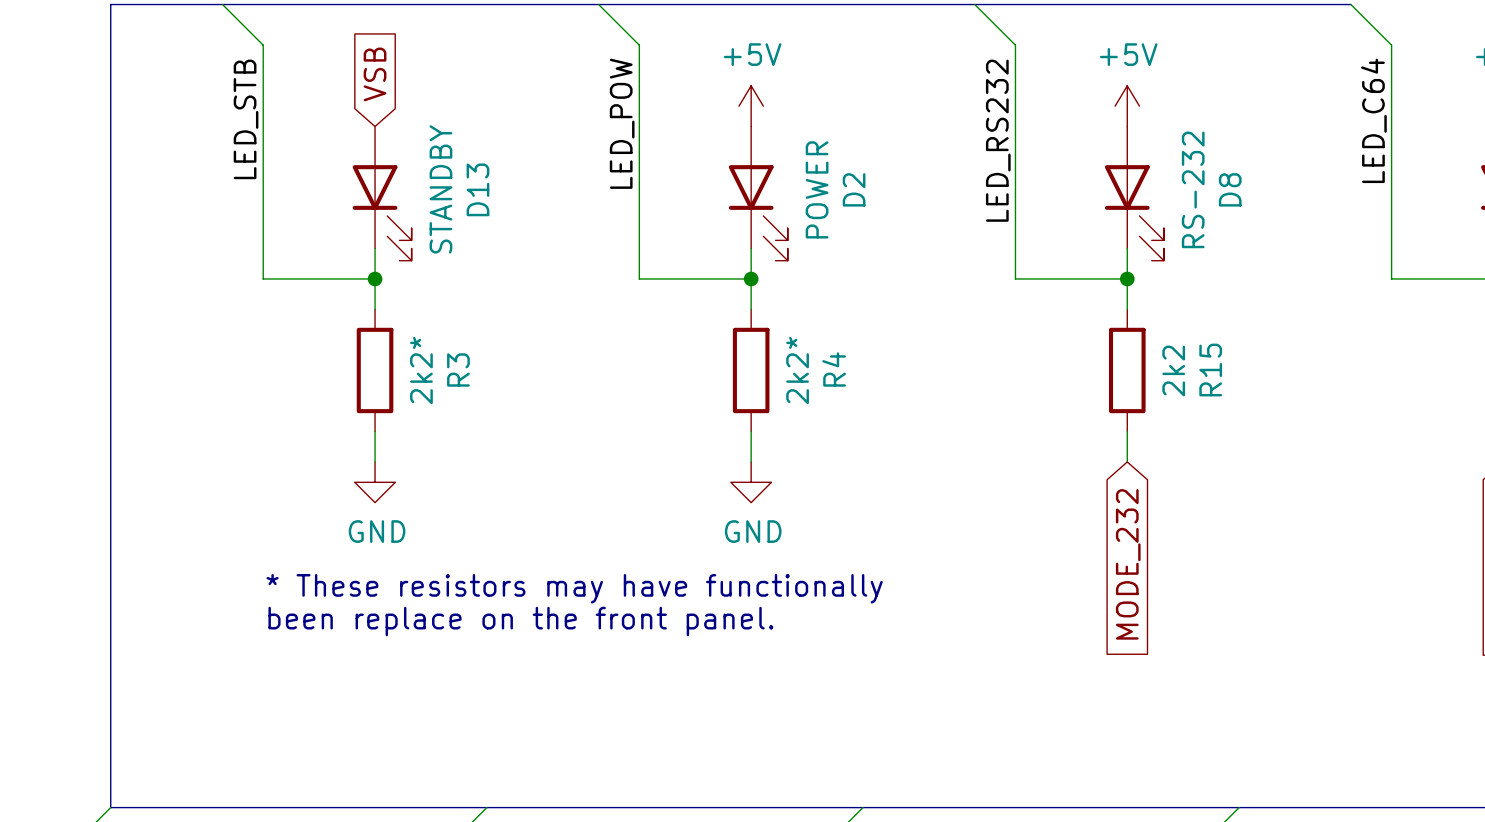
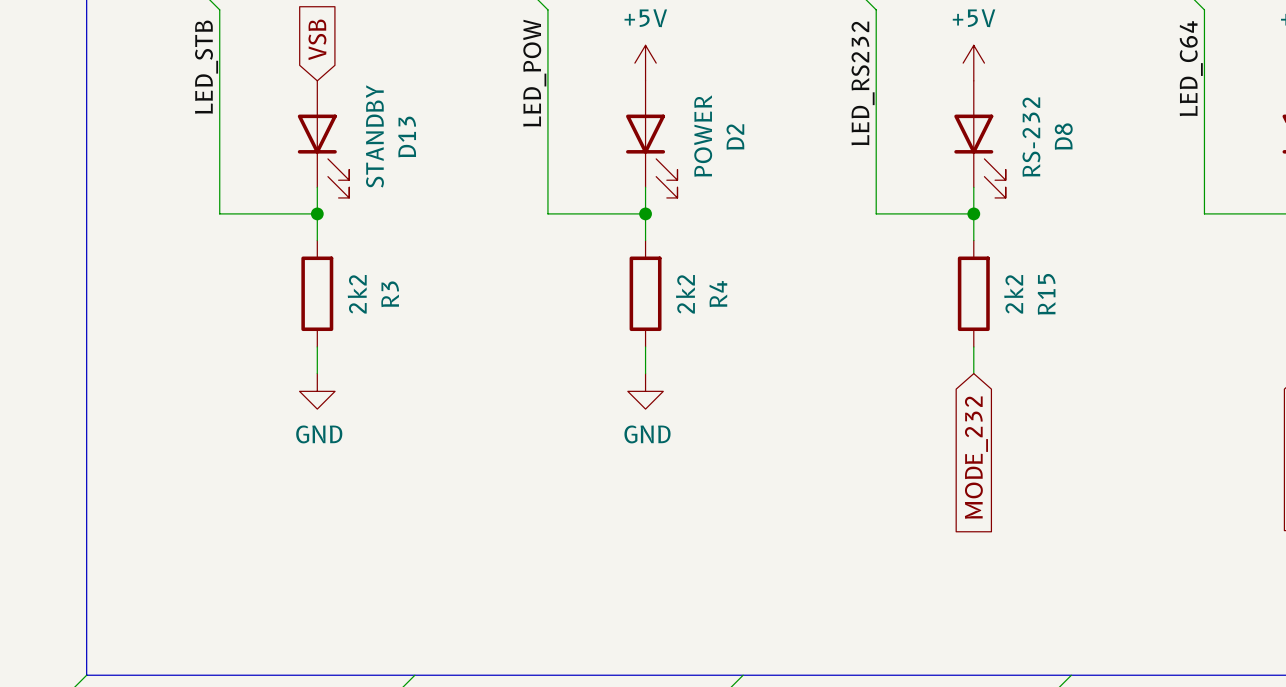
R3 value: 2k2* (421, 370) -> 2k2 (357, 294)
R4 value: 2k2* (797, 370) -> 2k2 (685, 294)
text: * These resistors may have functionally (574, 588) -> none
text: been replace on the front panel. (520, 621) -> none

